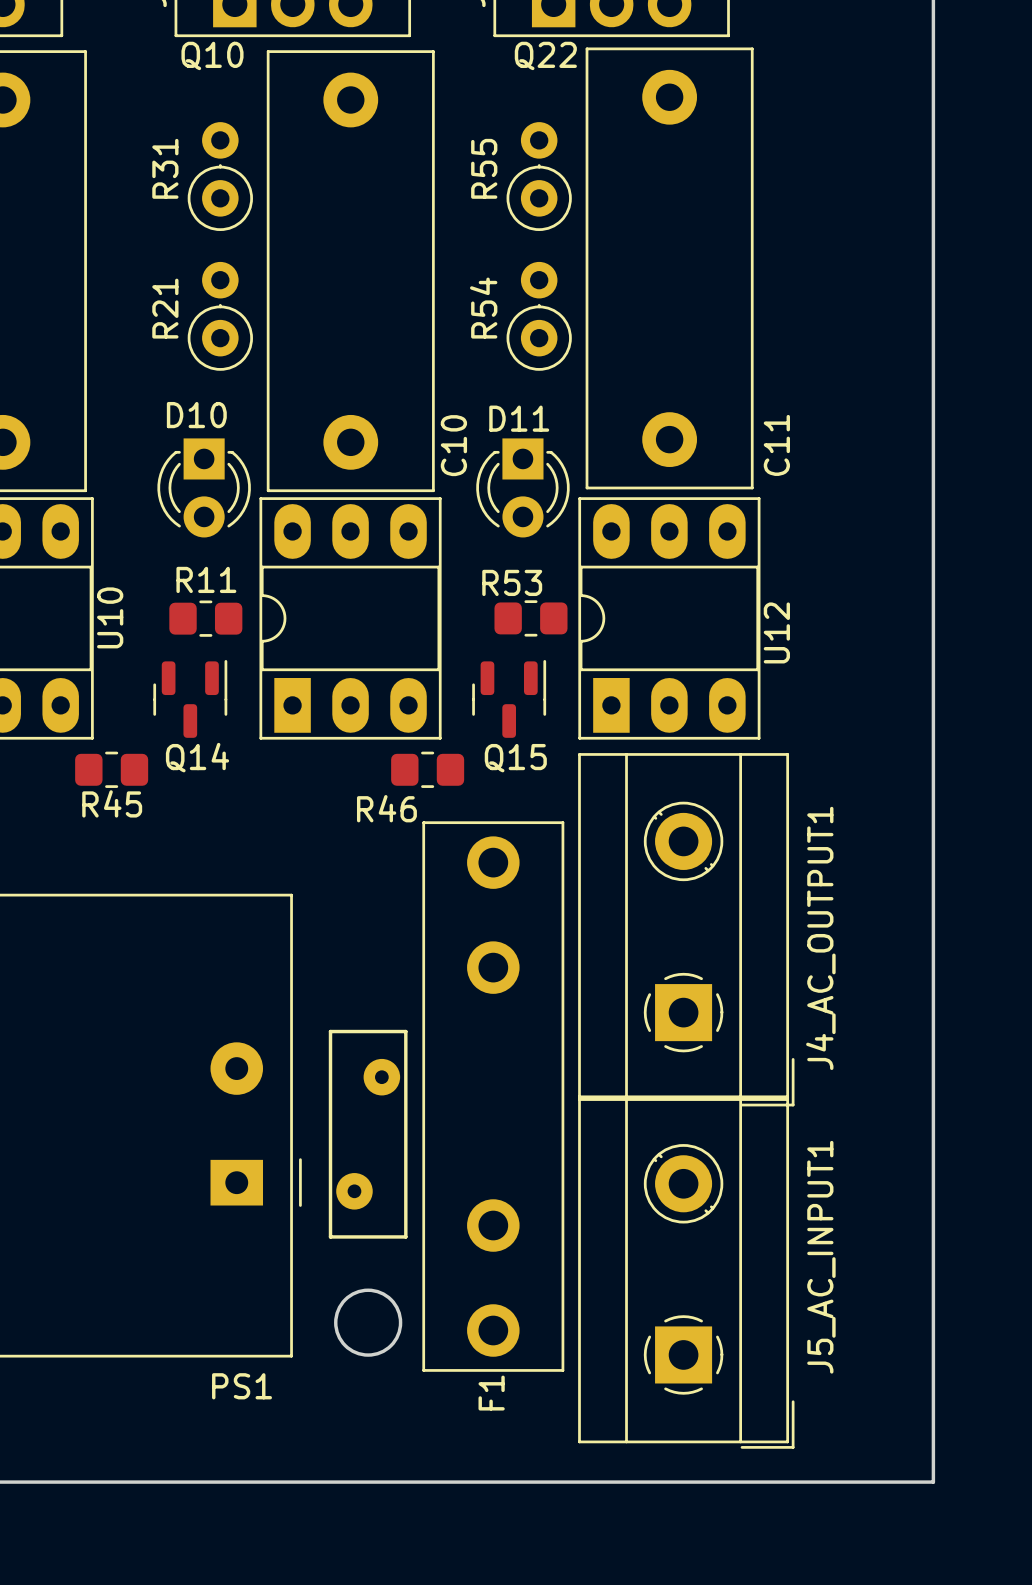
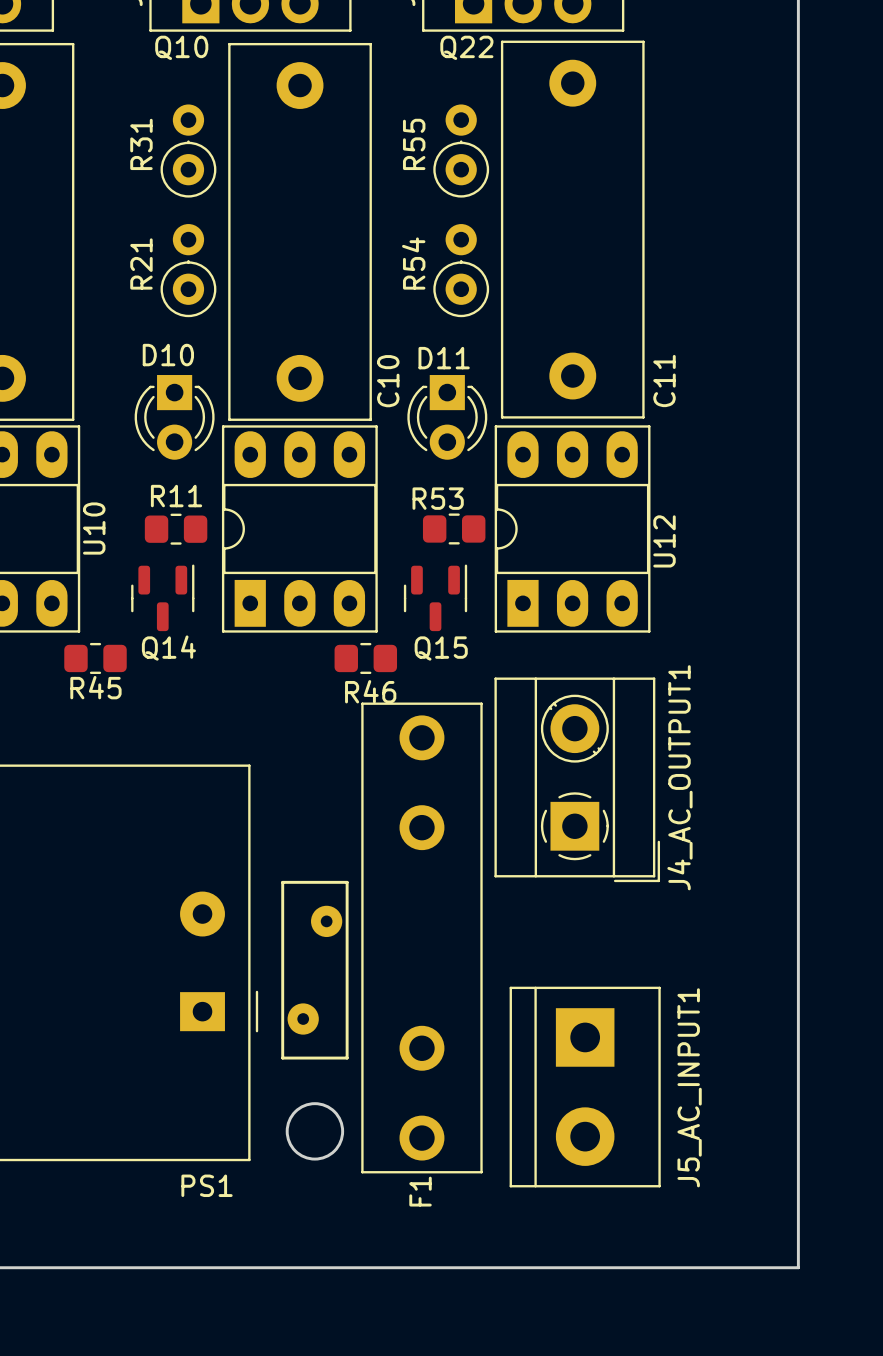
J4_AC_OUTPUT1 footprint: [578, 753, 795, 1107] -> [494, 677, 661, 883]
R46 name position: R46 (386, 808) -> R46 (370, 691)
J5_AC_INPUT1 footprint: [578, 1095, 795, 1449] -> [509, 986, 661, 1188]

